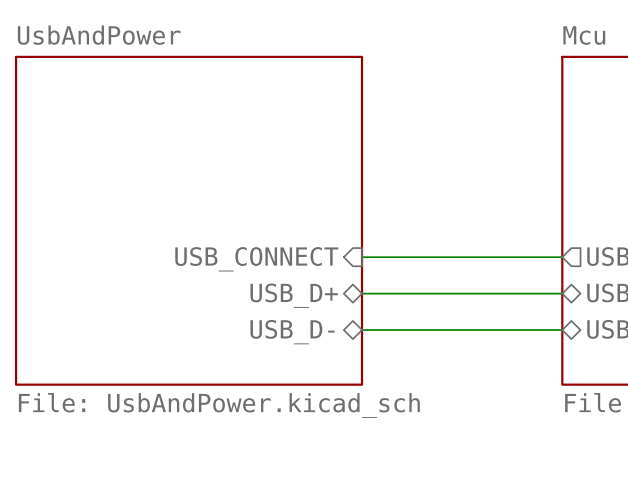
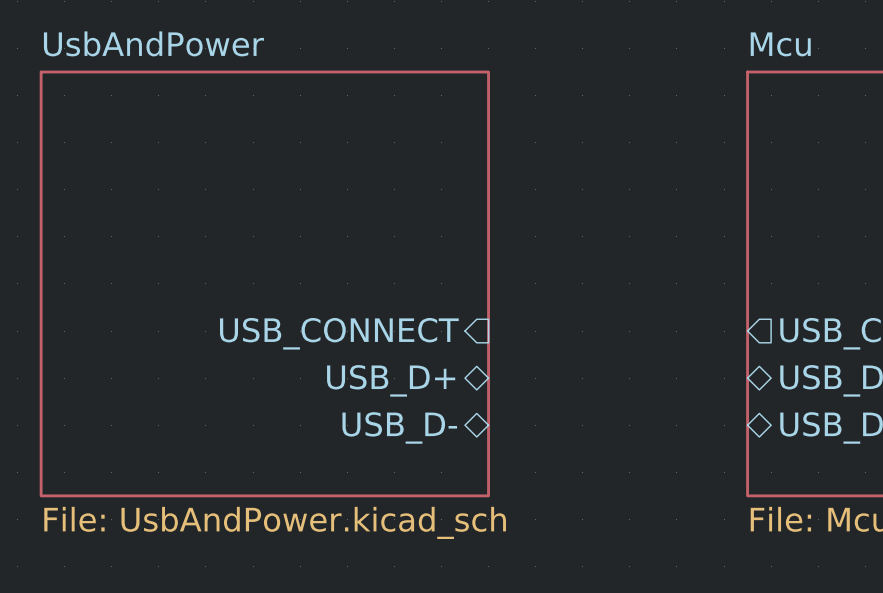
wire: (362, 257) (562, 257) -> none
wire: (362, 293) (562, 293) -> none
wire: (362, 330) (562, 330) -> none

